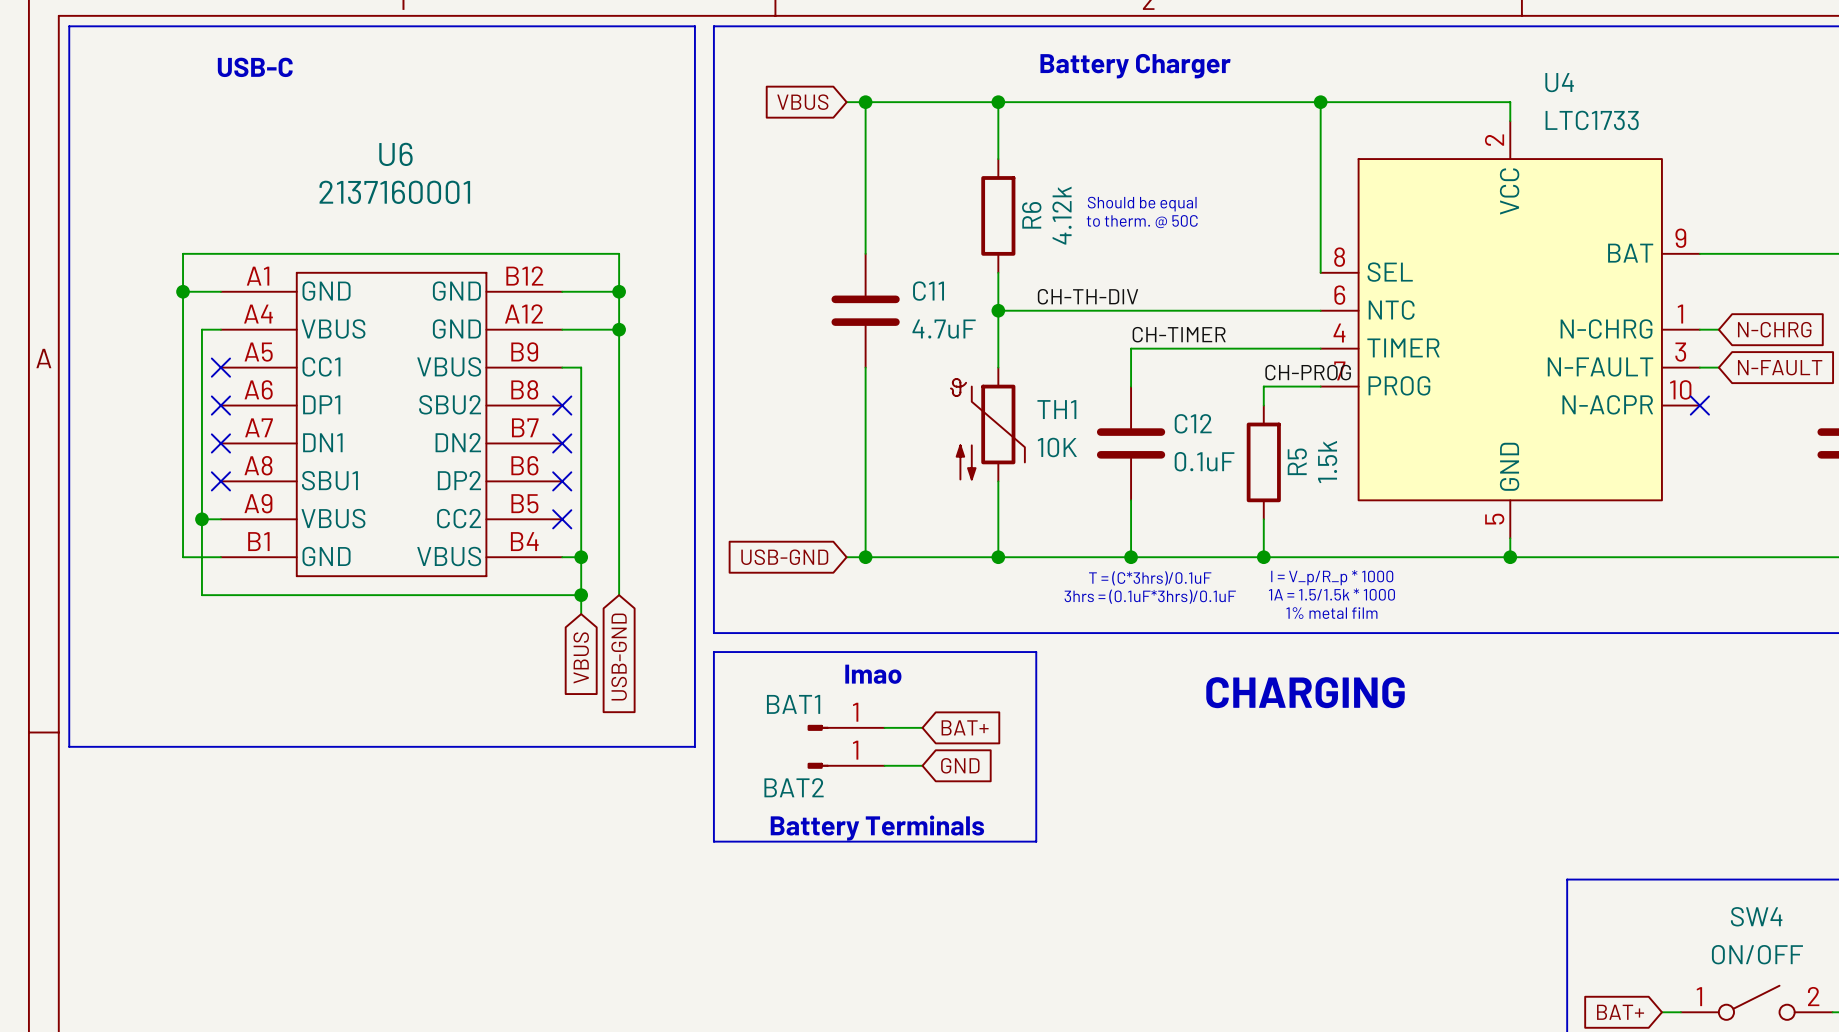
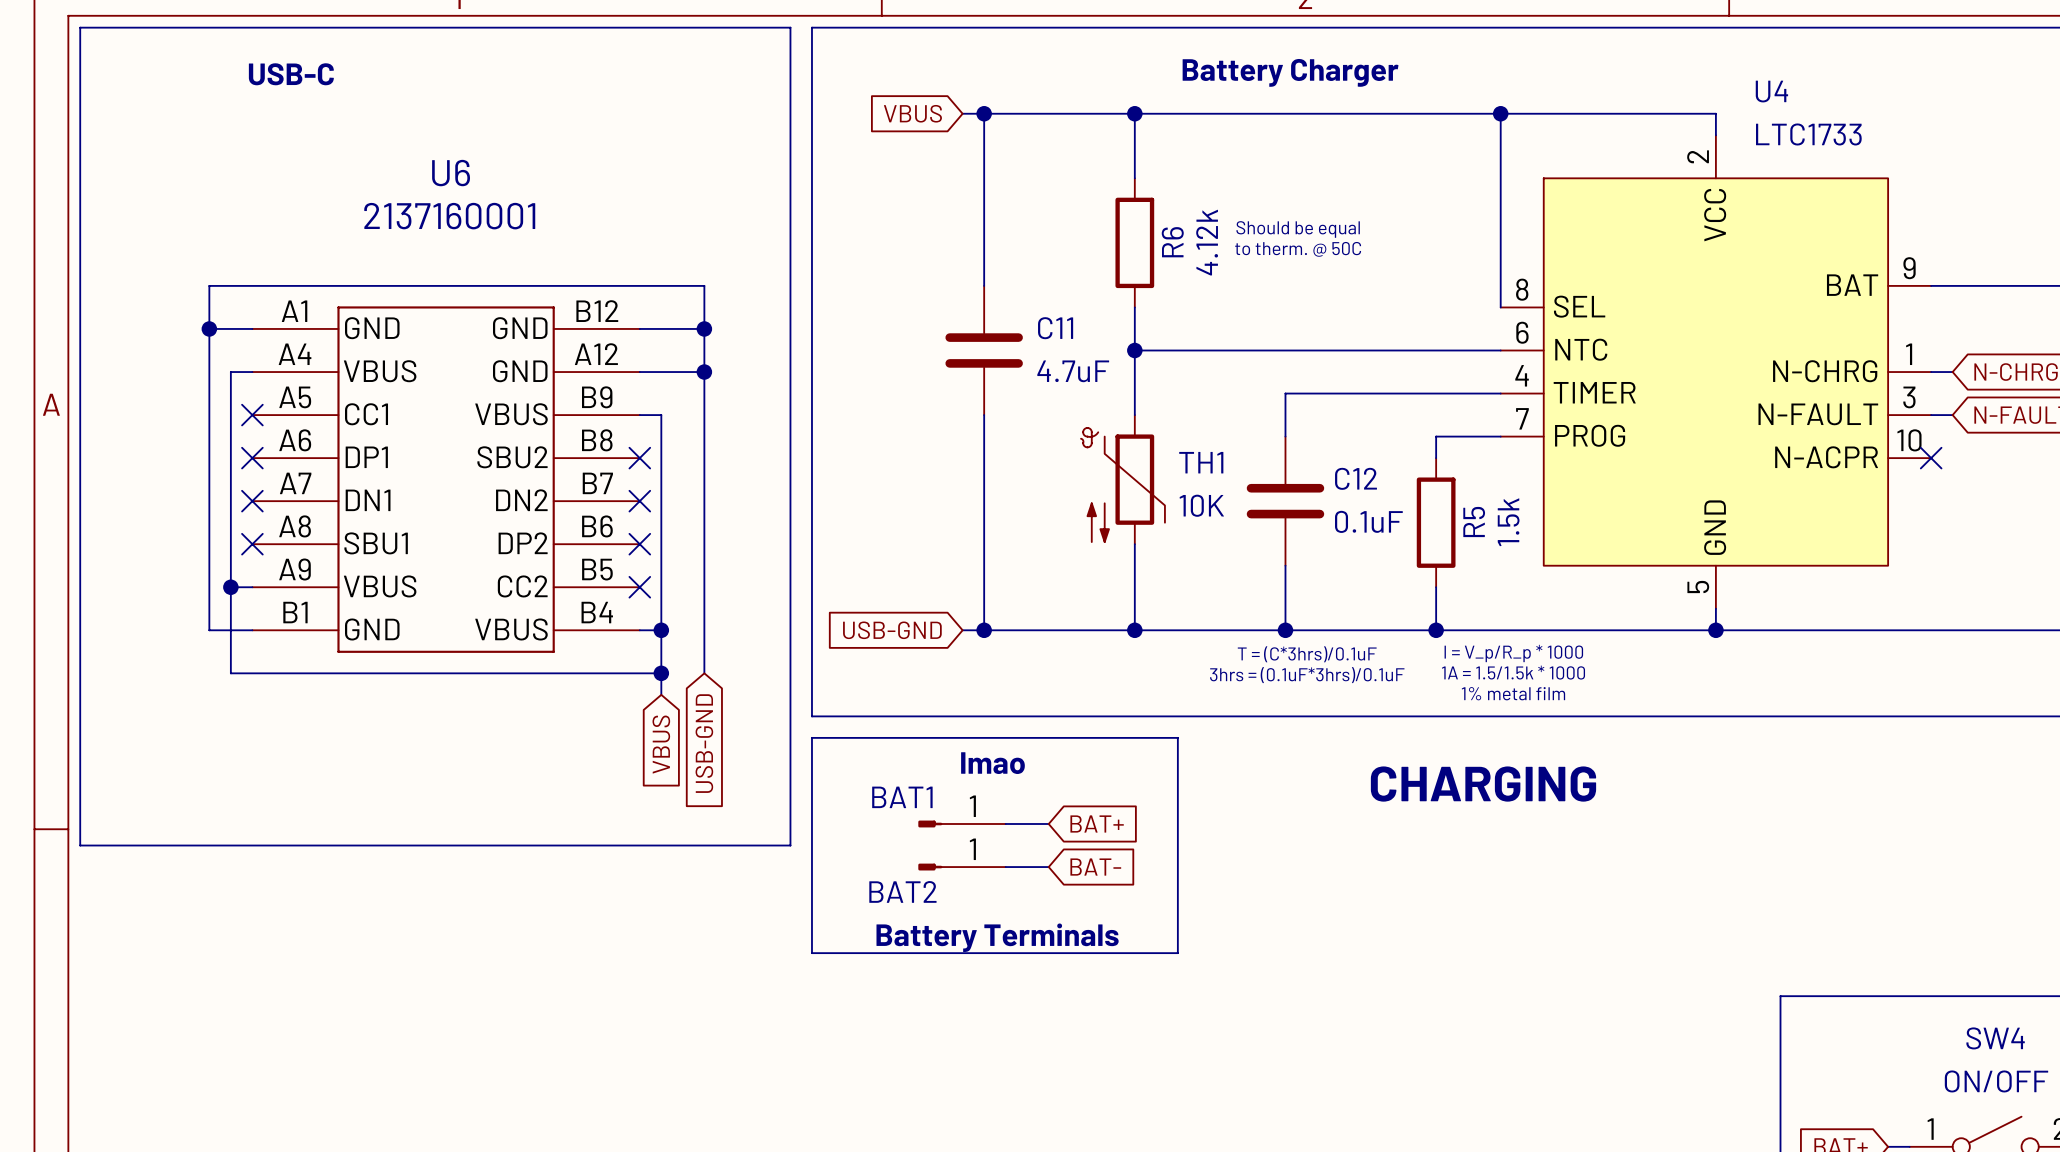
label: CH-TH-DIV (1088, 296) -> none
label: CH-TIMER (1179, 334) -> none
label: CH-PROG (1308, 372) -> none
global label: GND (960, 765) -> BAT- (1095, 867)

